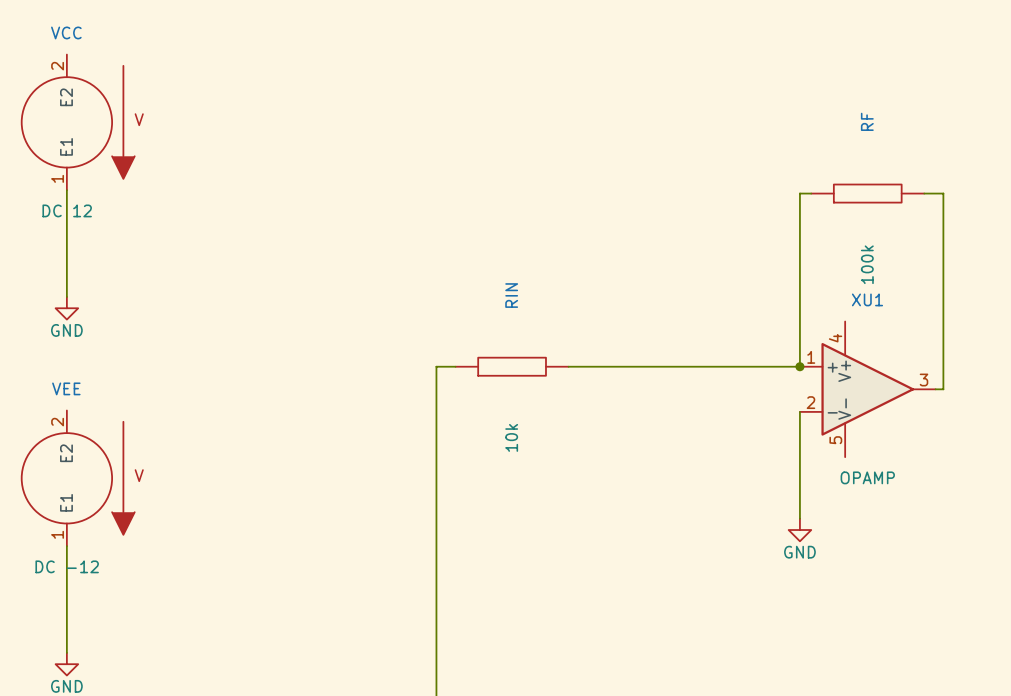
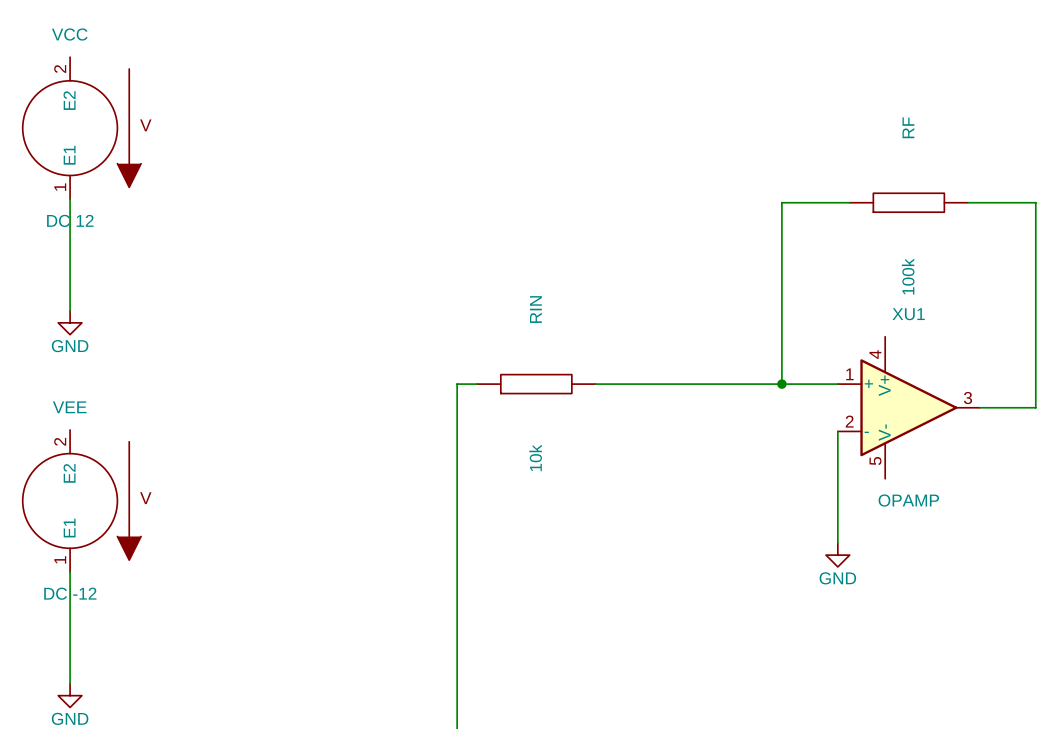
wire: (799, 193) (799, 366) -> (837, 202) (781, 202) (781, 384)
wire: (943, 193) (943, 389) -> (988, 202) (1035, 202) (1035, 407) (988, 407)
junction position: (799, 366) -> (781, 384)

